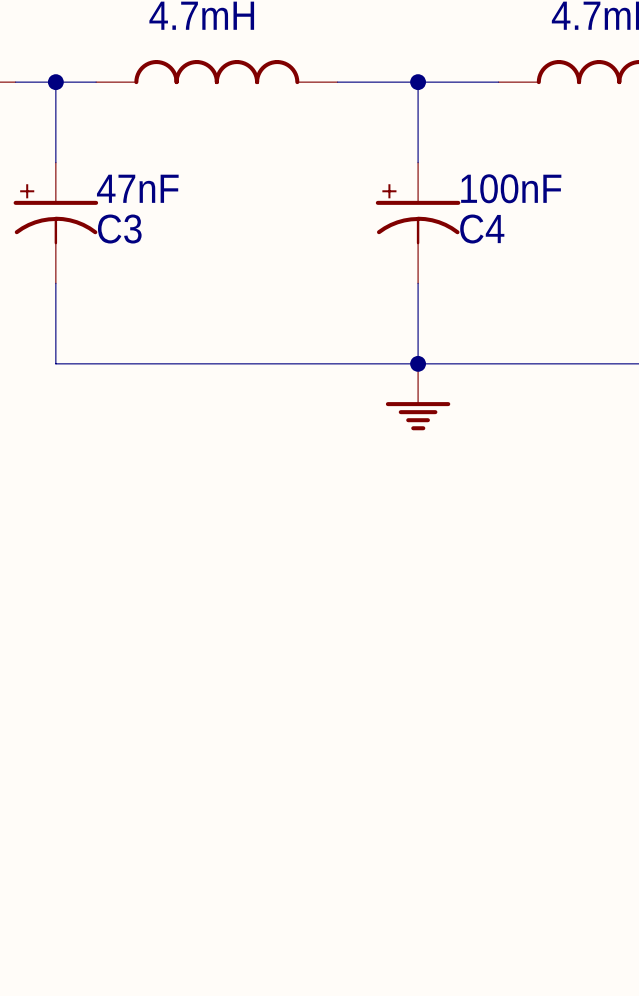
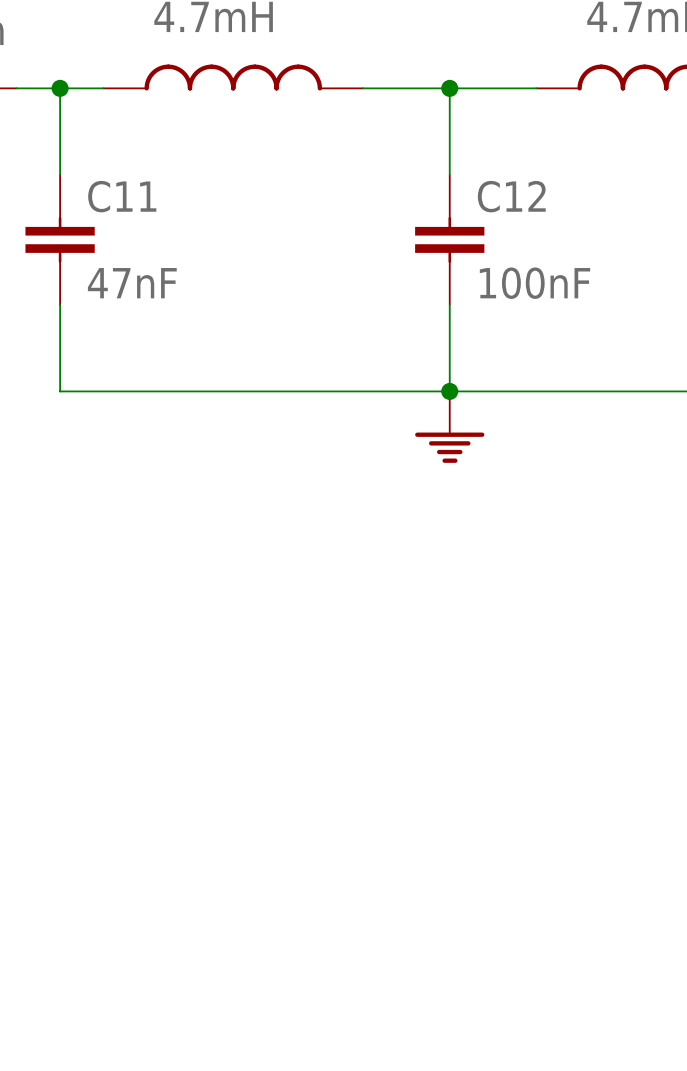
C3: 47nF (55, 222) -> none
C11: none -> 47nF (60, 239)
C4: 100nF (418, 222) -> none
C12: none -> 100nF (449, 239)

